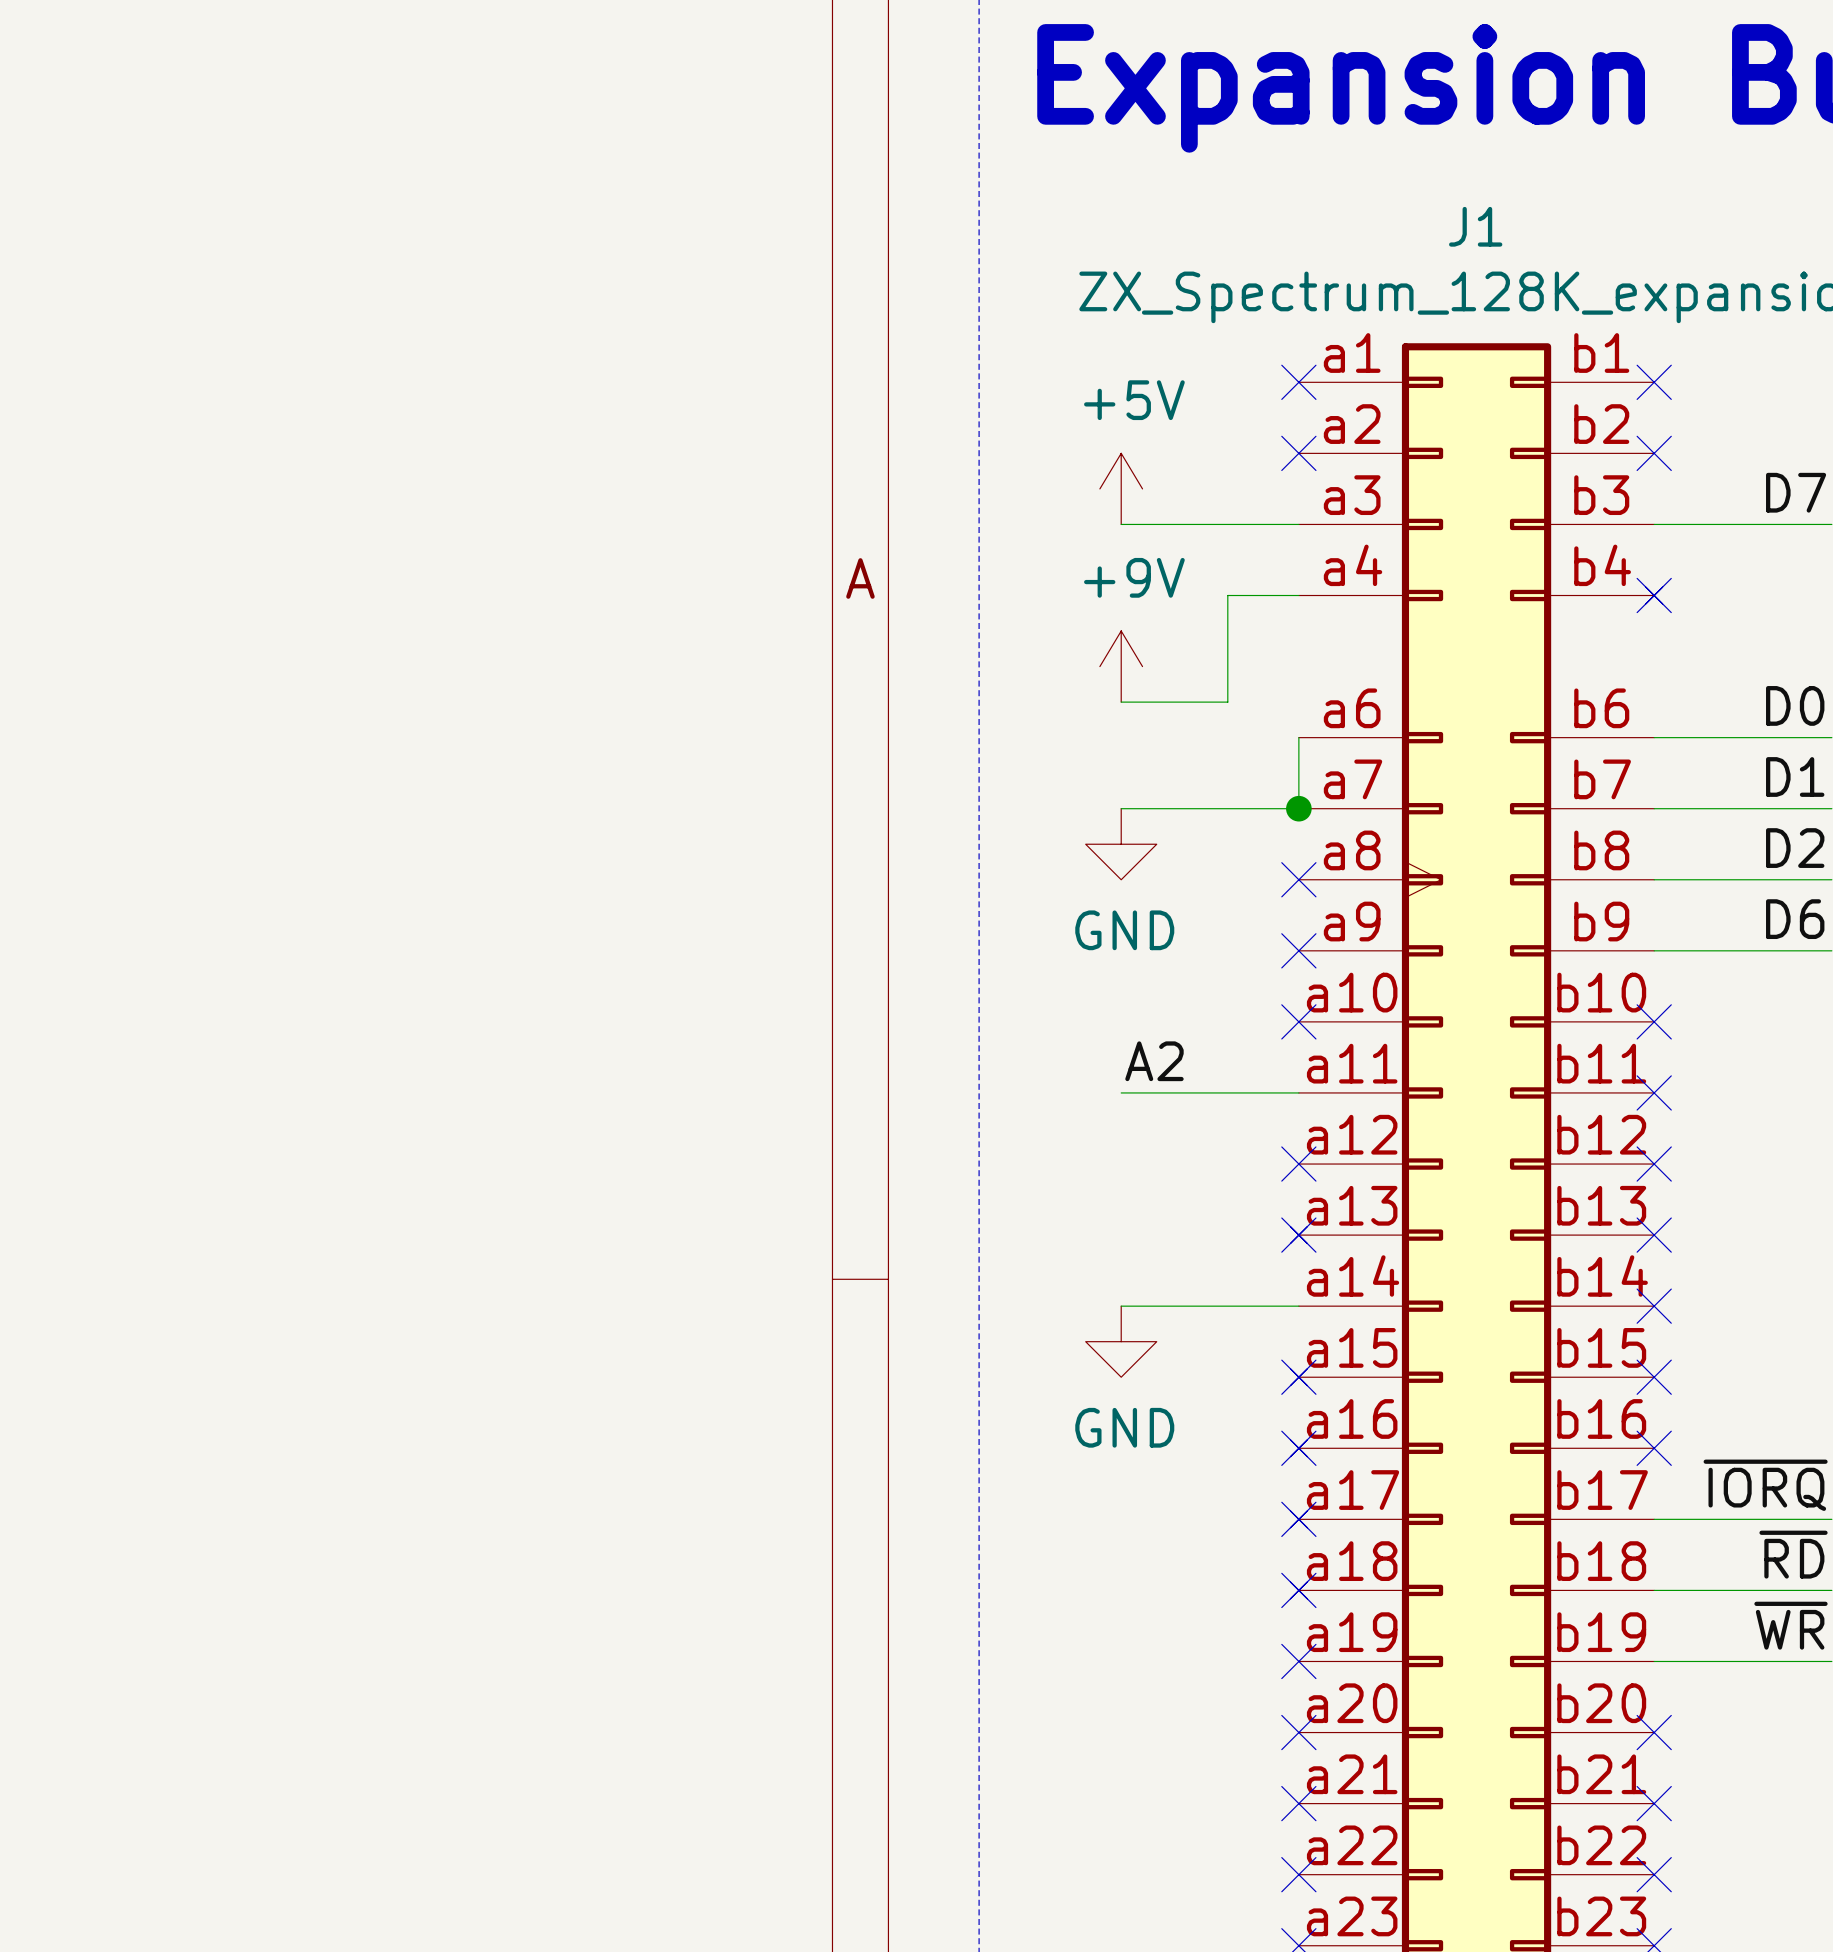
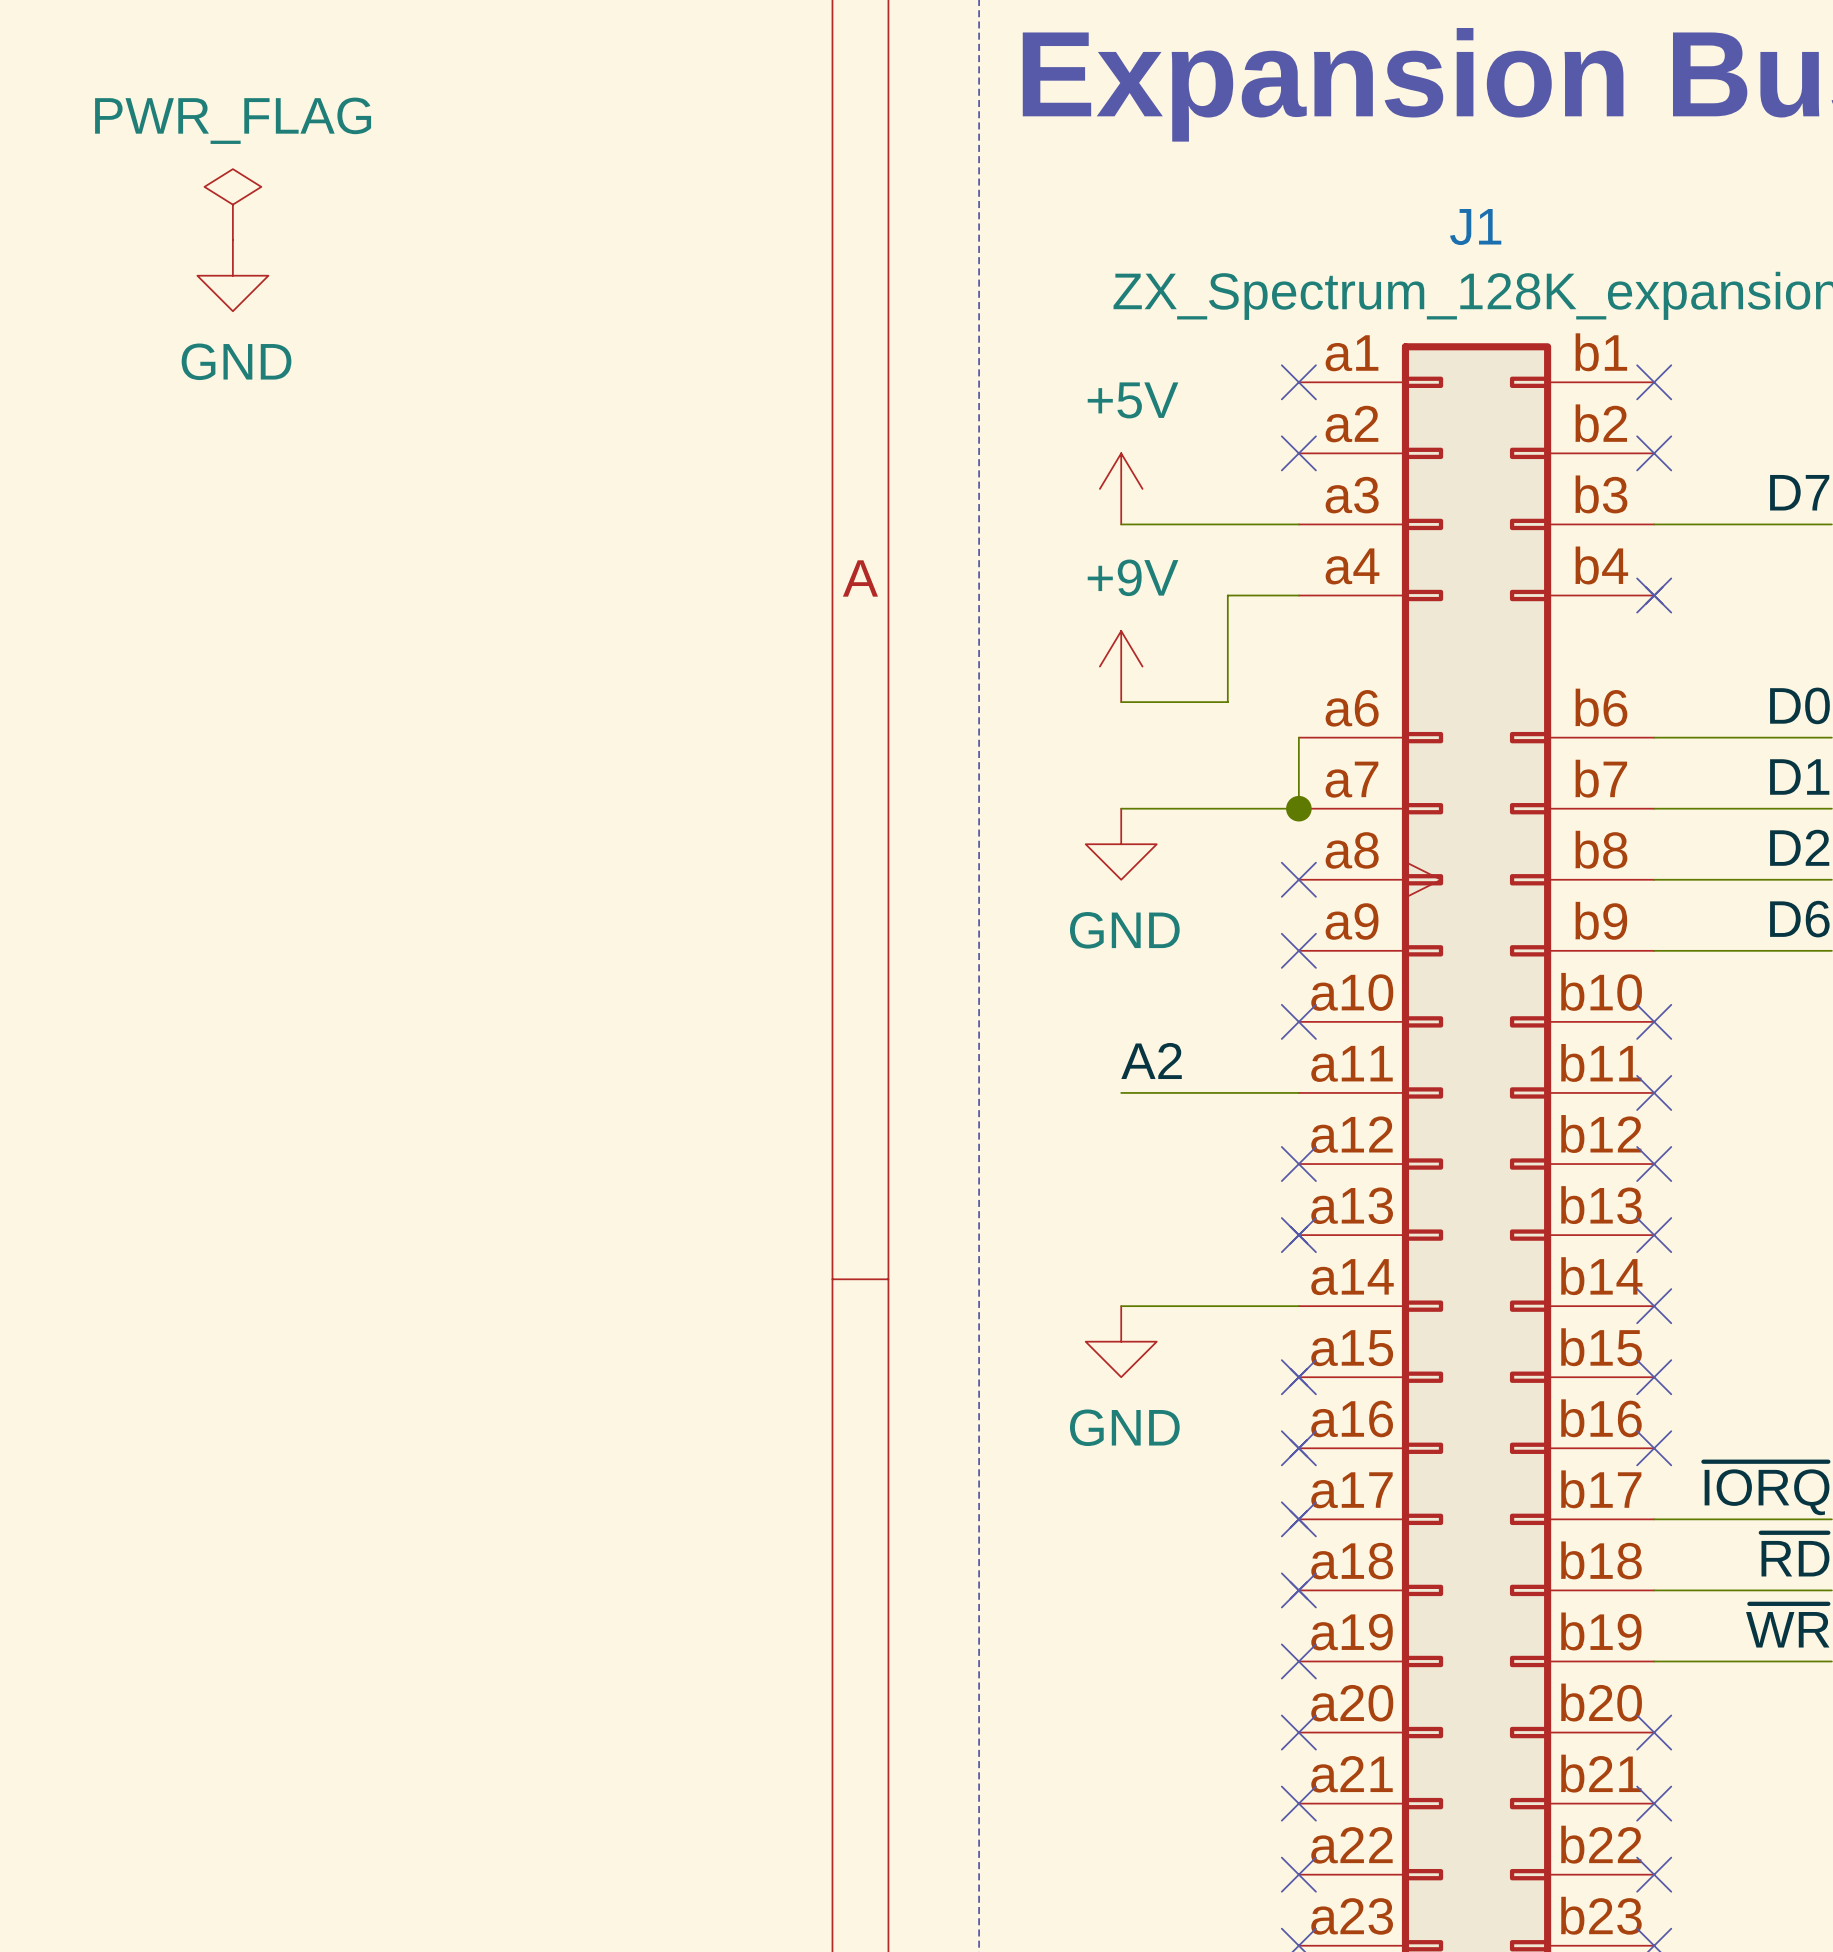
power symbol: none -> PWR_FLAG (232, 204)
power symbol: none -> GND (232, 275)

